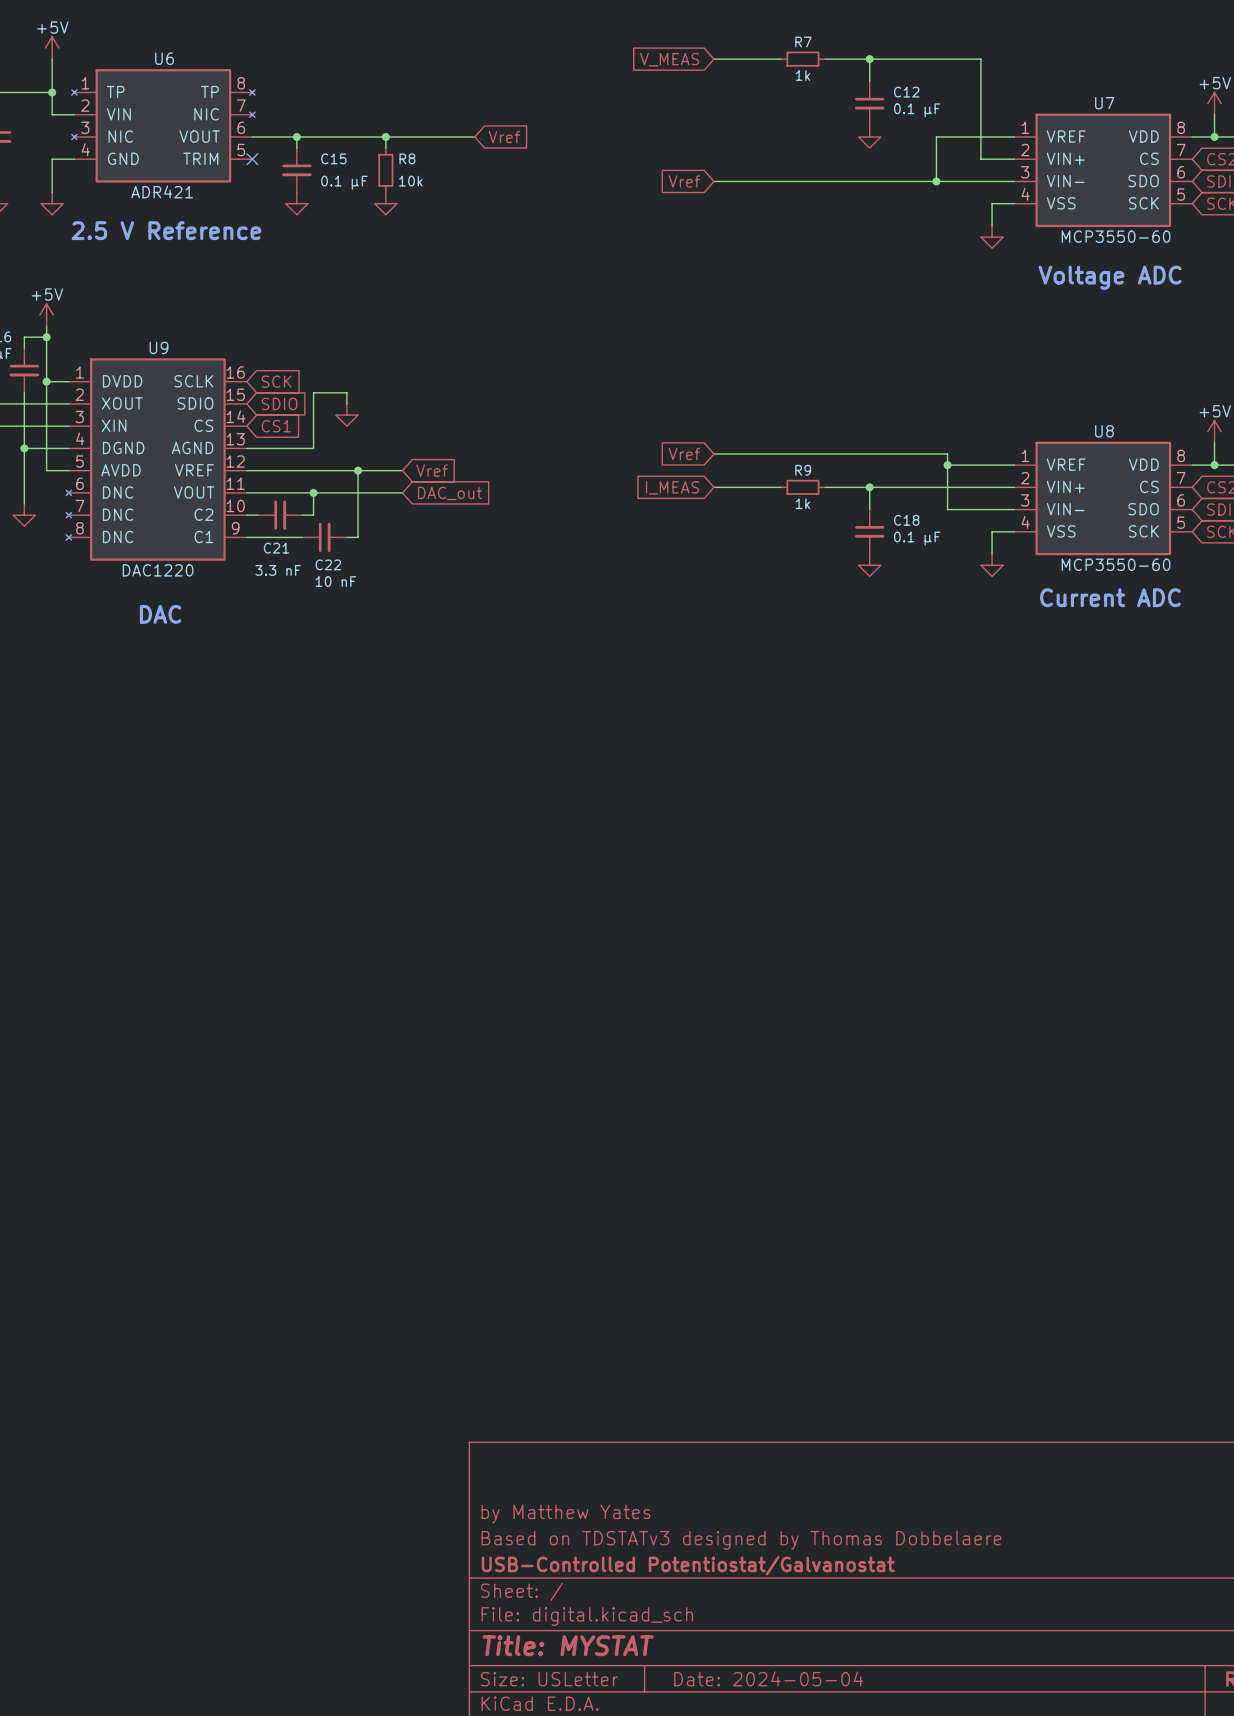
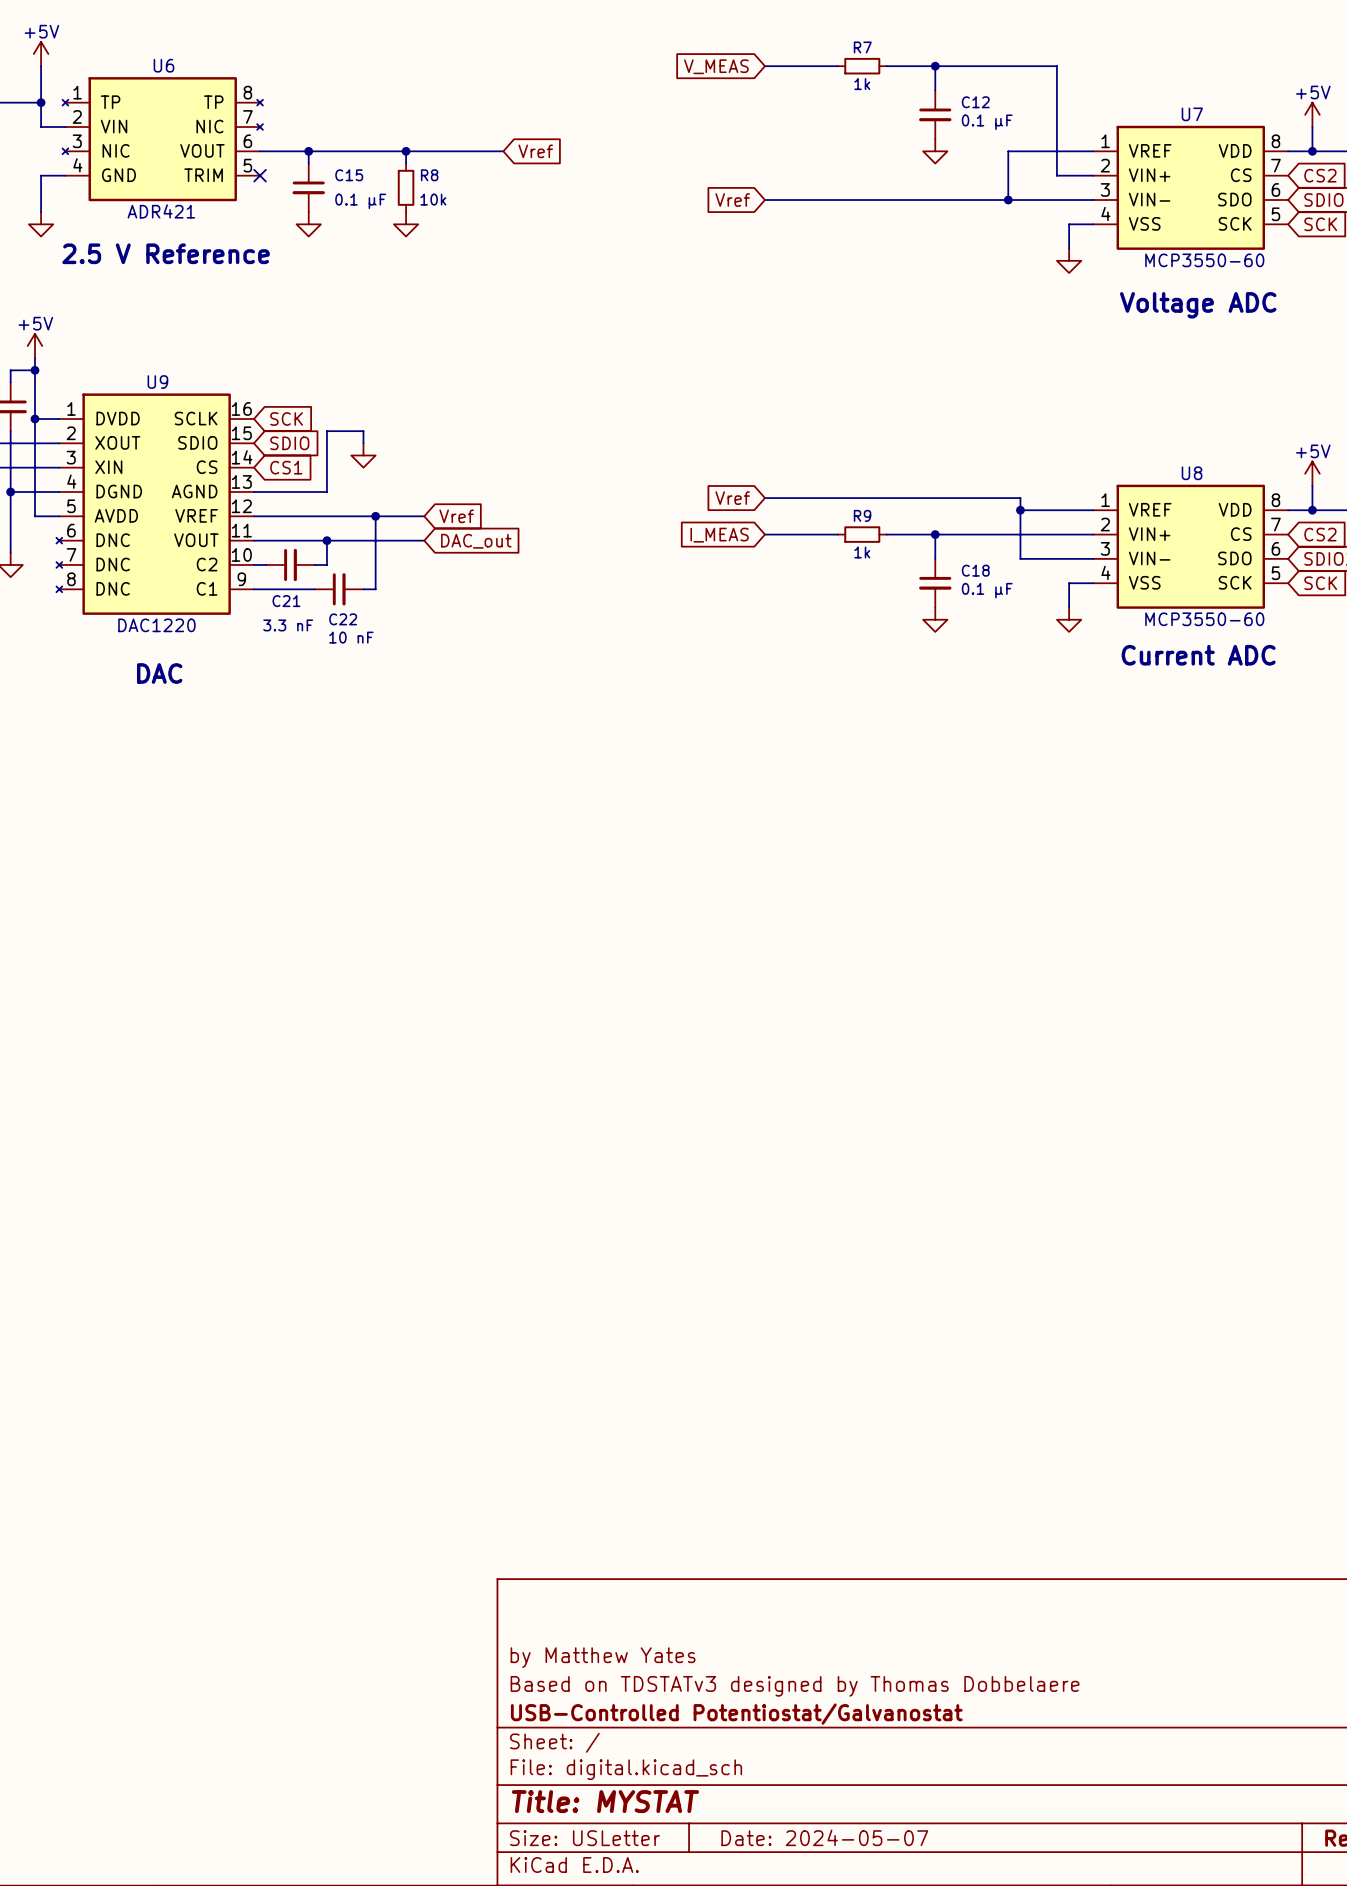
title block: Date: 2024-05-04 (768, 1678) -> Date: 2024-05-07 (824, 1837)

